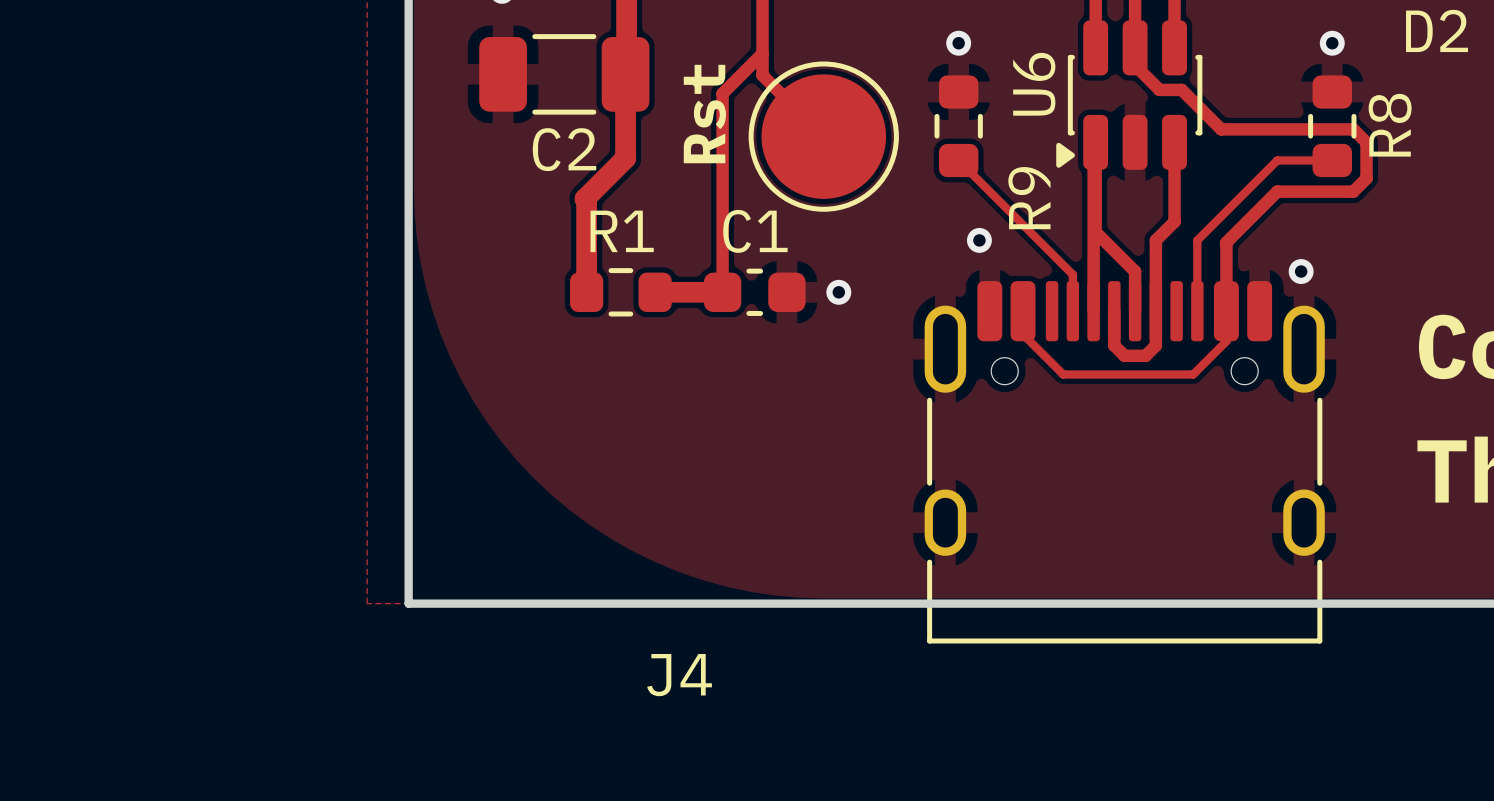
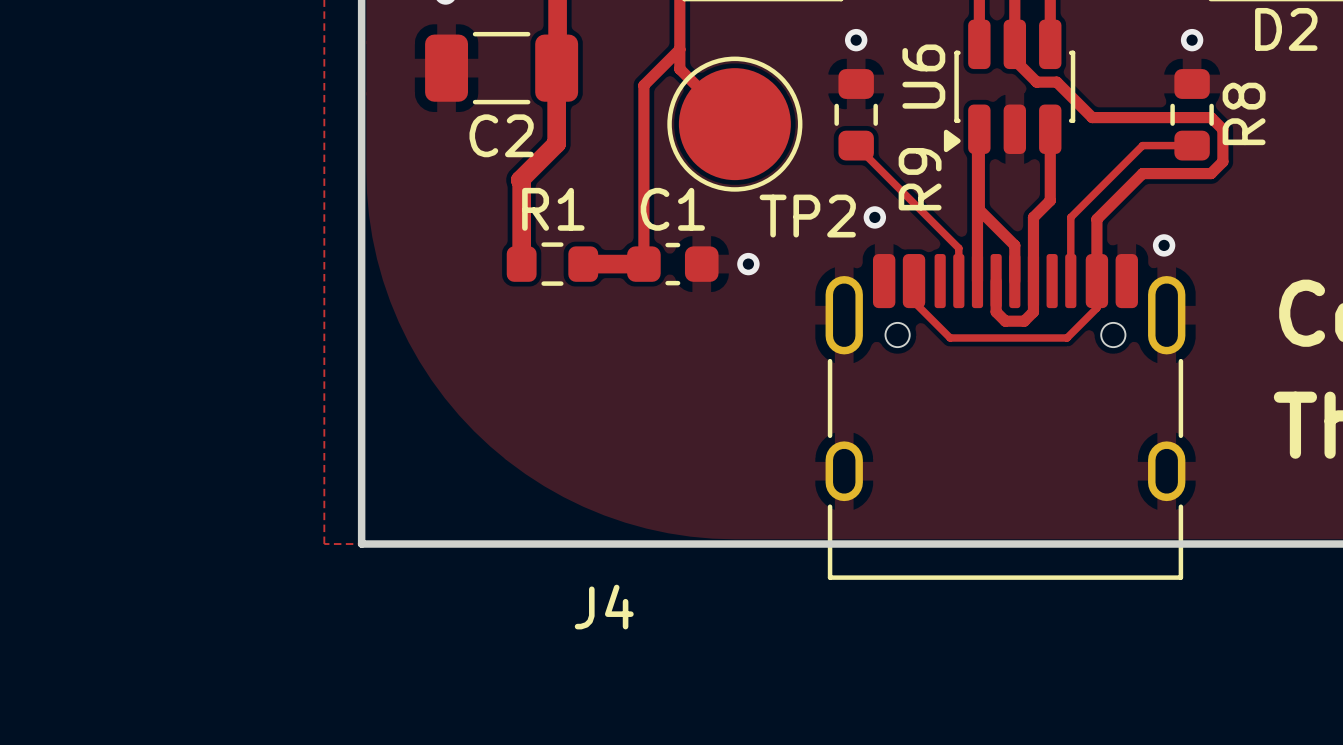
text: Rst (704, 114) -> none
TP2 name: none -> TP2 (807, 216)

